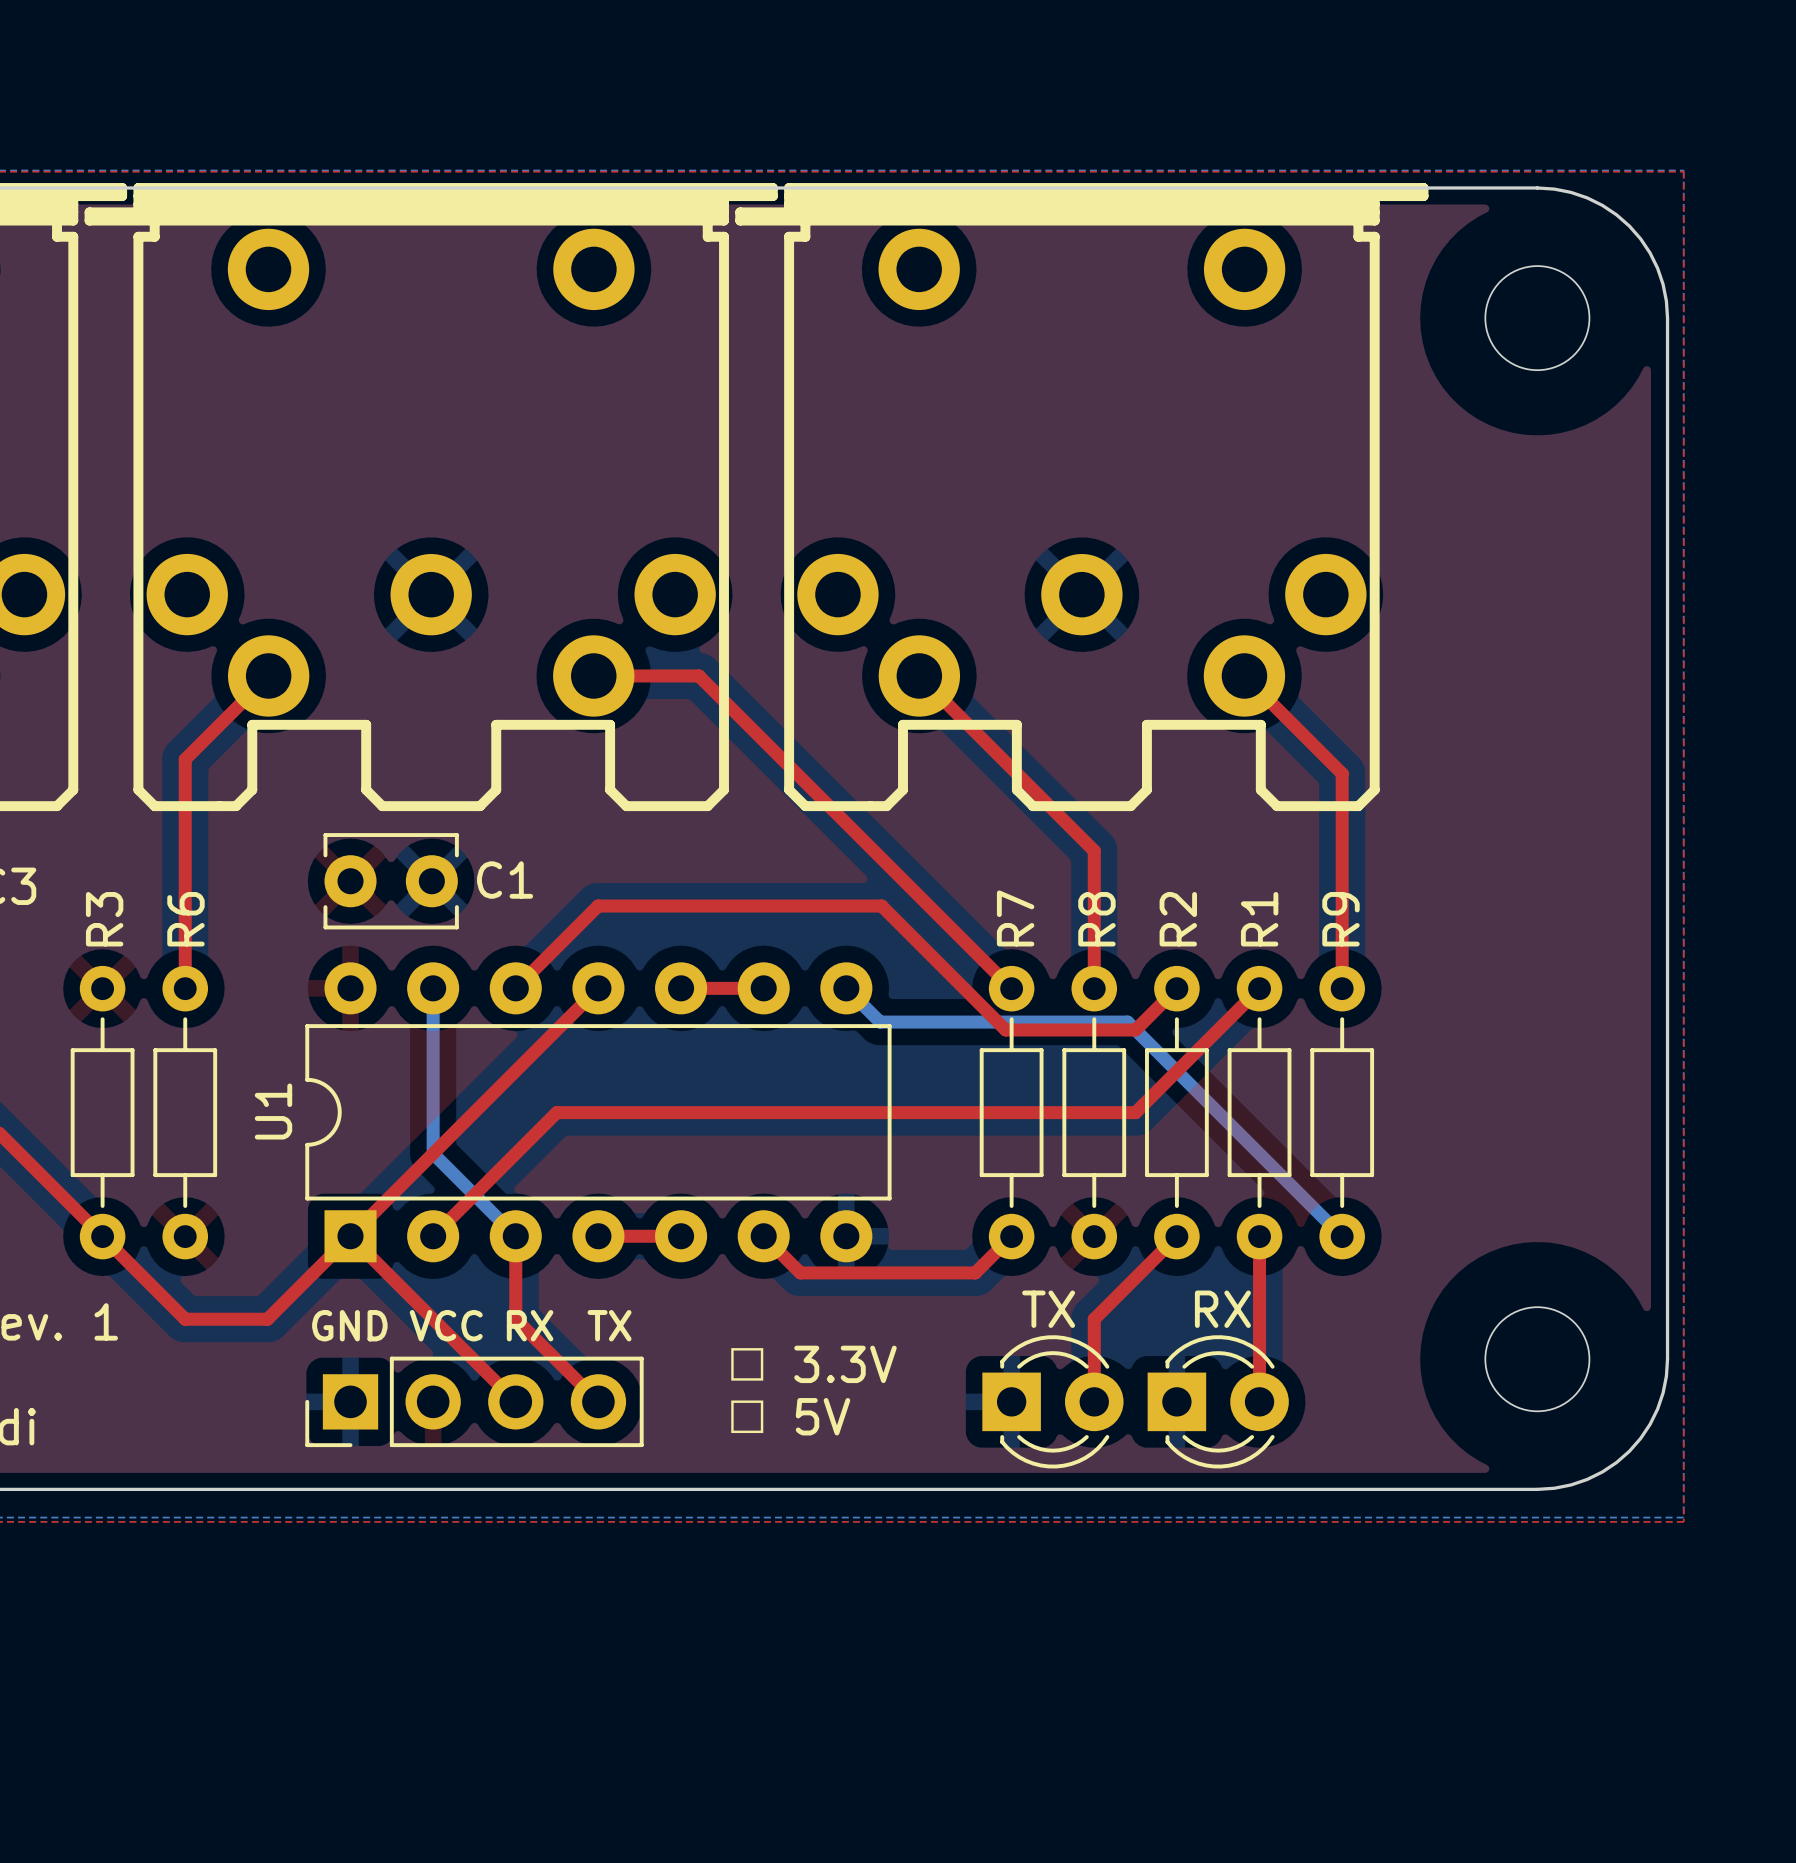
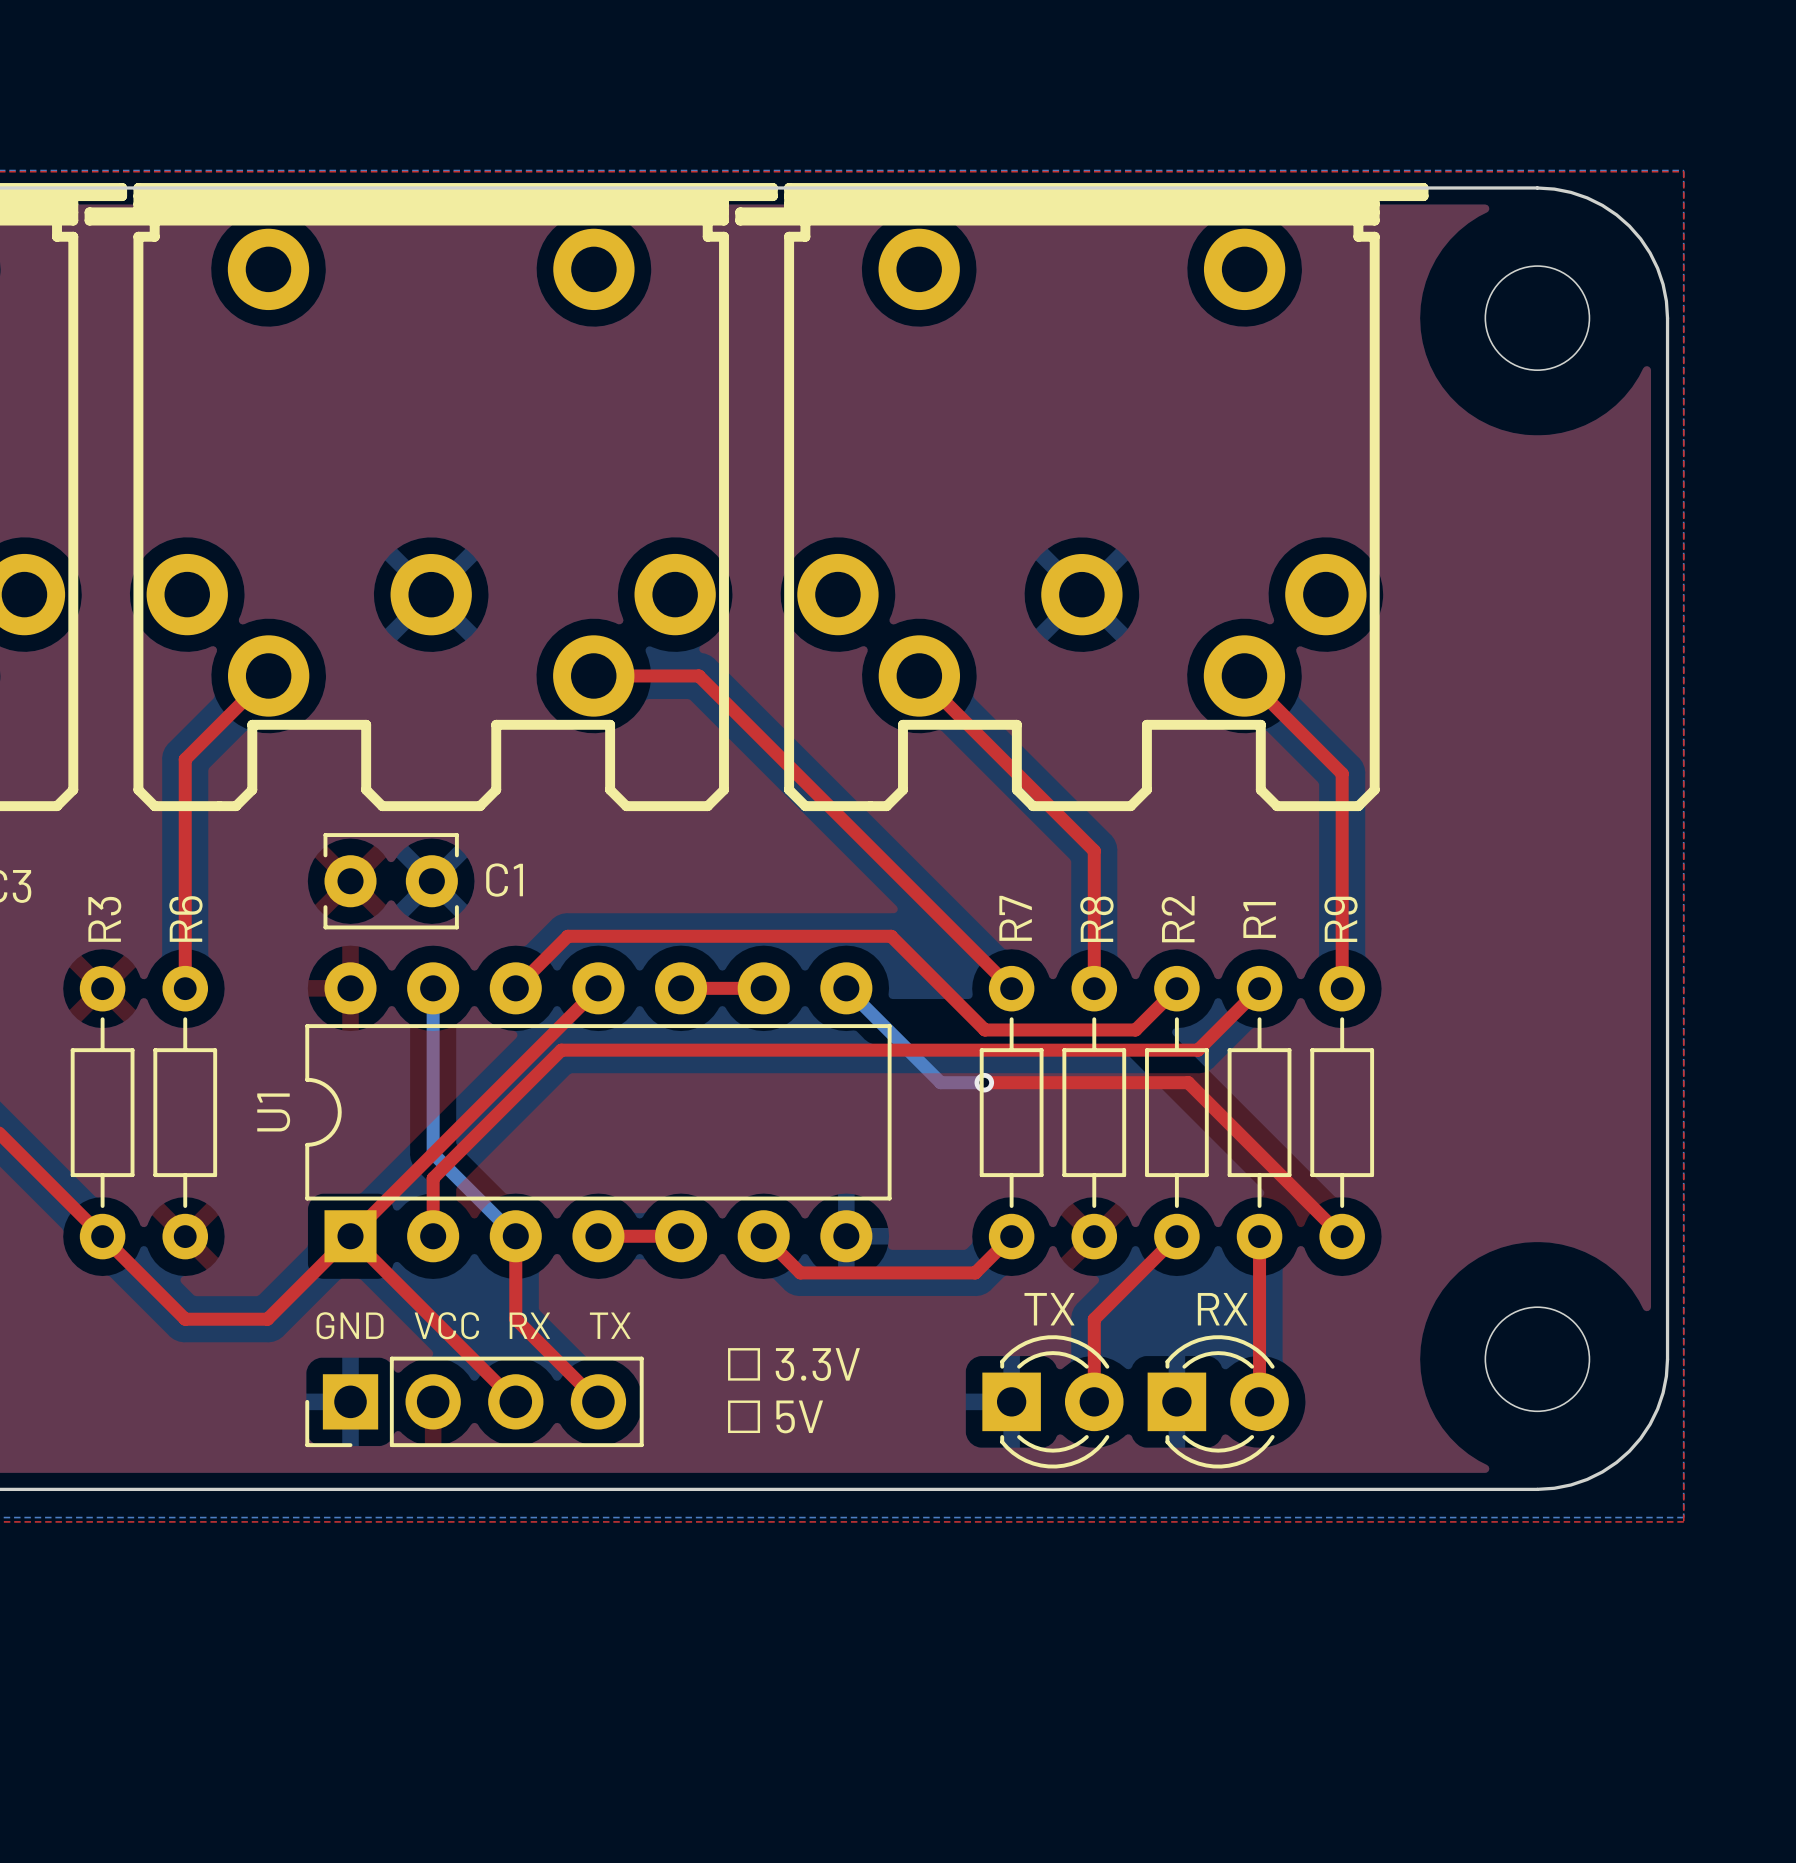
top track: (567, 936) (598, 906) (881, 906) (1005, 1029) -> (567, 936) (891, 936) (984, 1029) (1005, 1029)
bottom track: (880, 1022) (1127, 1022) (1342, 1236) -> (880, 1022) (940, 1082) (984, 1082)
top track: (1198, 1050) (1135, 1112) (556, 1112) (433, 1236) -> (1198, 1050) (561, 1050) (433, 1178) (433, 1236)
top track: none -> (984, 1082) (1188, 1082) (1342, 1236)
via: none -> (984, 1082)

